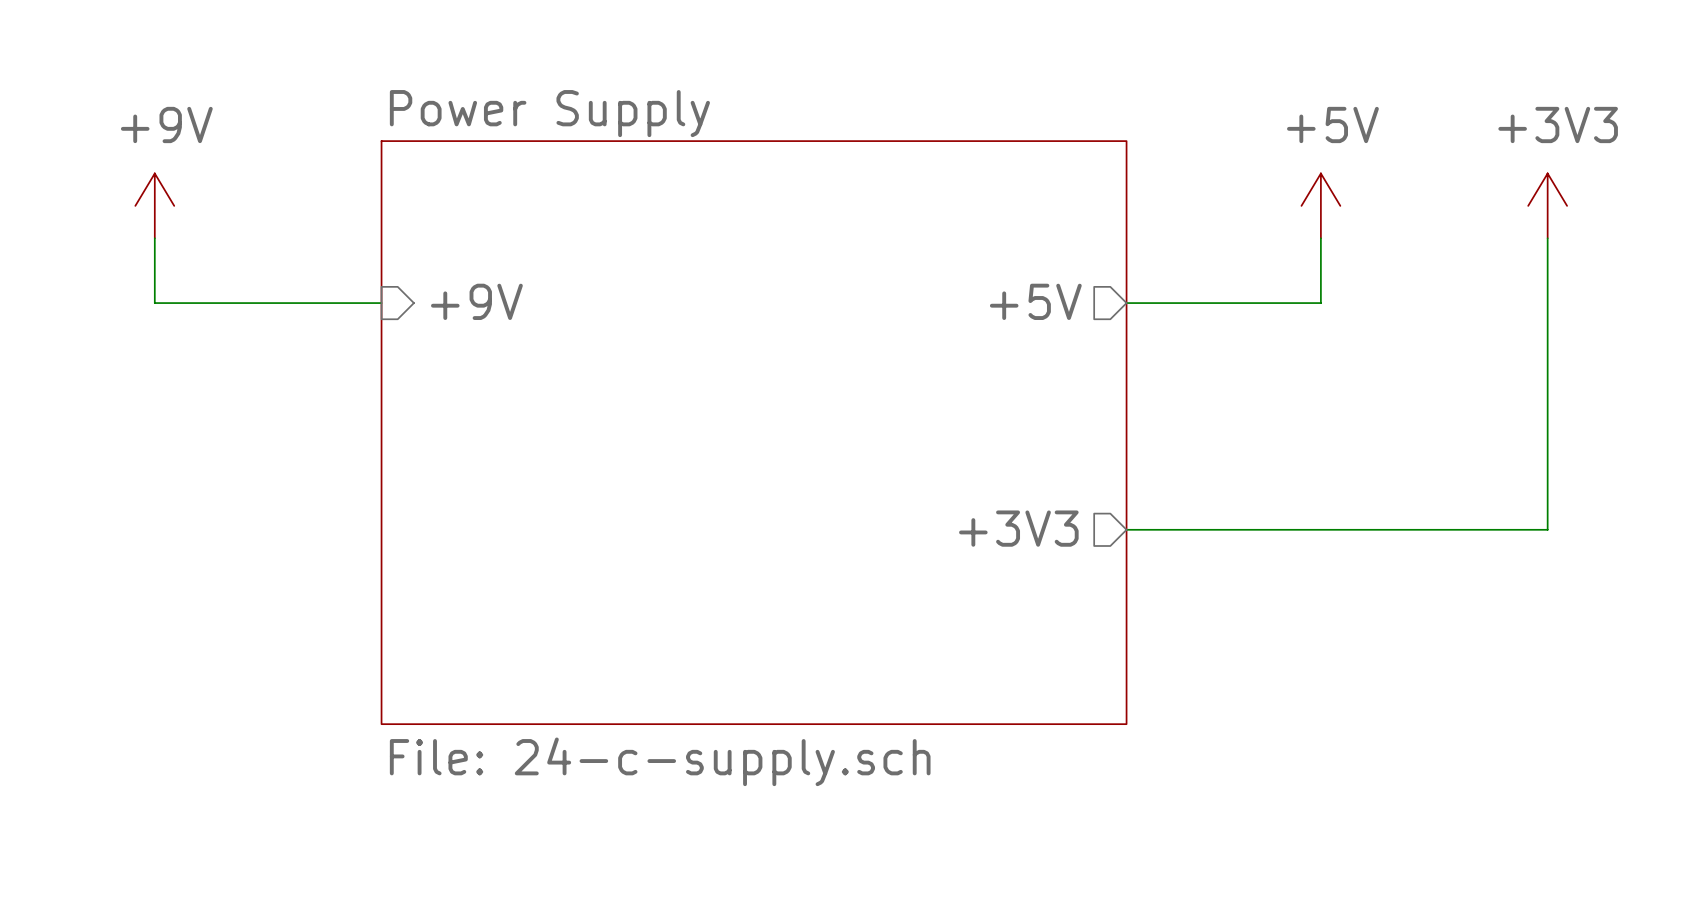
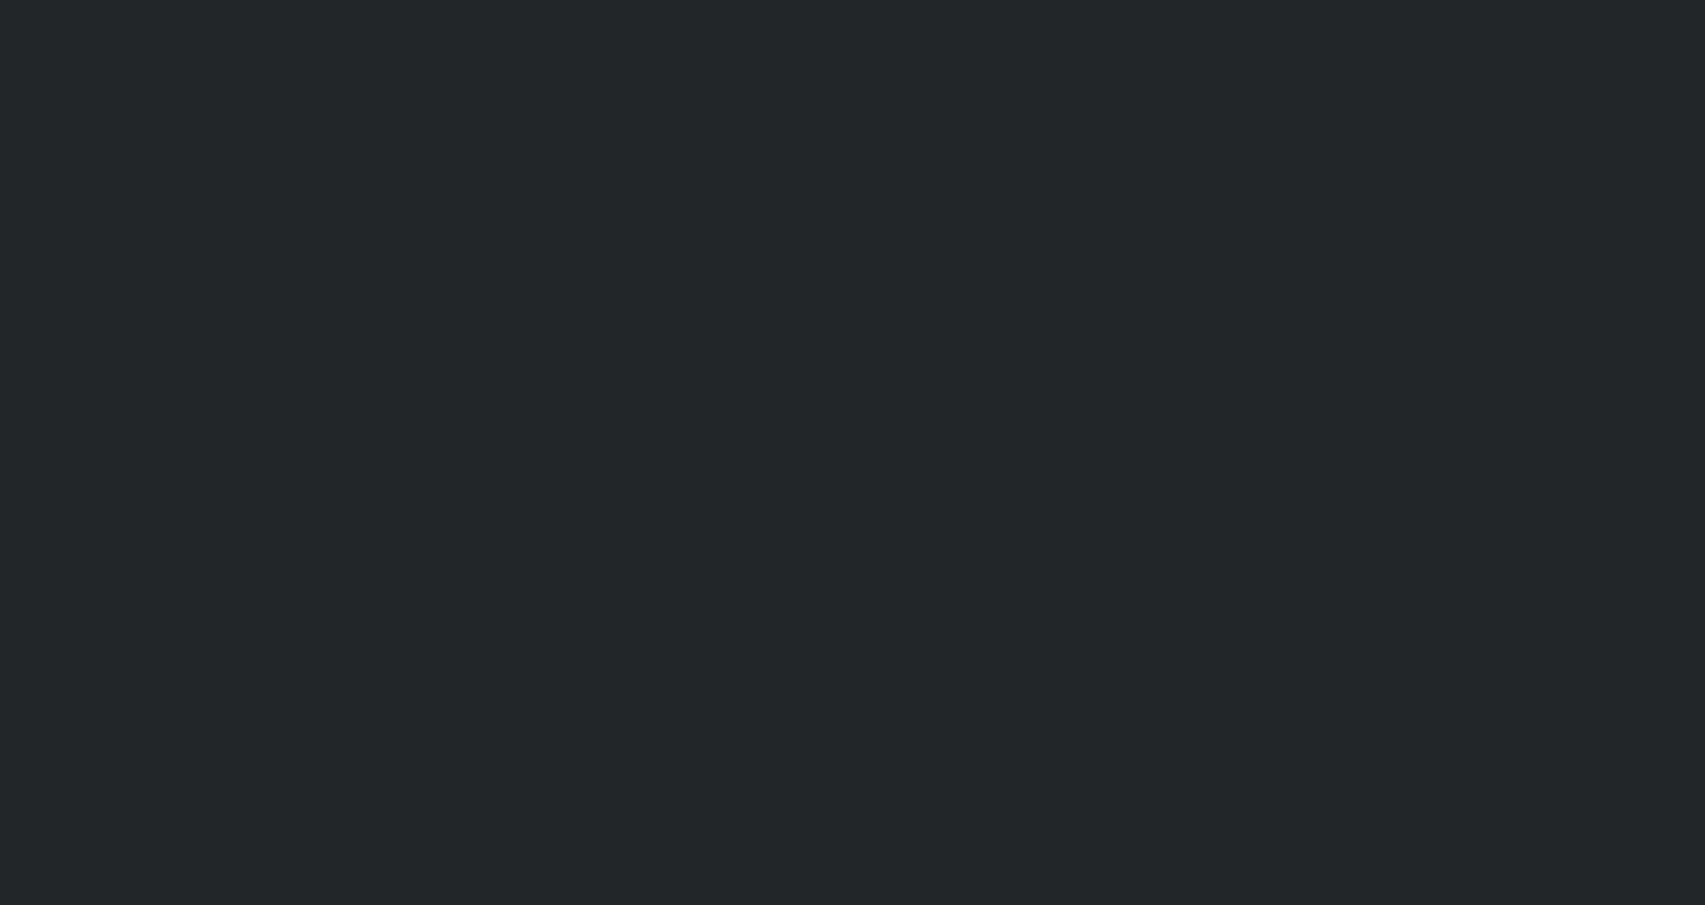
power symbol: +9V (154, 205) -> none
power symbol: +5V (1320, 205) -> none
power symbol: +3V3 (1547, 205) -> none
wire: (154, 238) (154, 303) (381, 303) -> none
wire: (1320, 238) (1320, 303) (1126, 303) -> none
wire: (1547, 238) (1547, 529) (1126, 529) -> none
sheet pin: +9V (476, 301) -> none
sheet pin: +5V (1035, 301) -> none
sheet Power Supply: File: 24-c-supply.sch (754, 432) -> none
sheet pin: +3V3 (1018, 528) -> none

